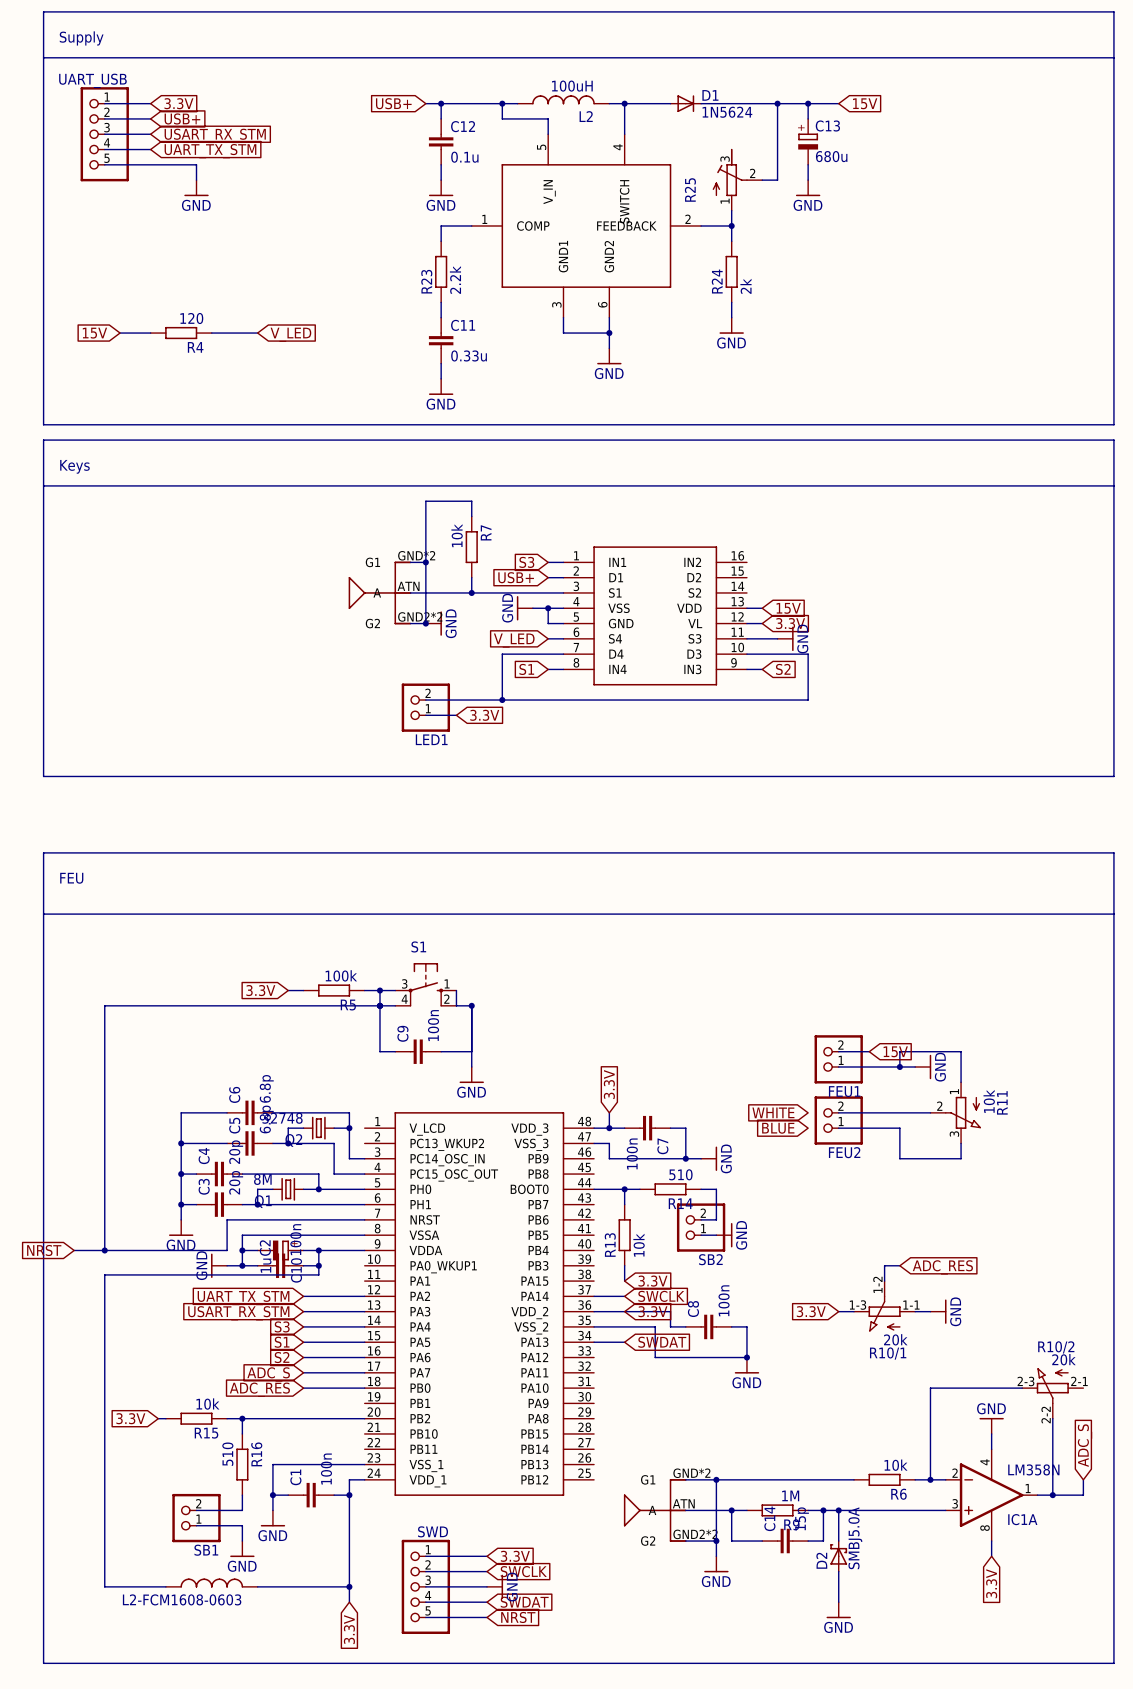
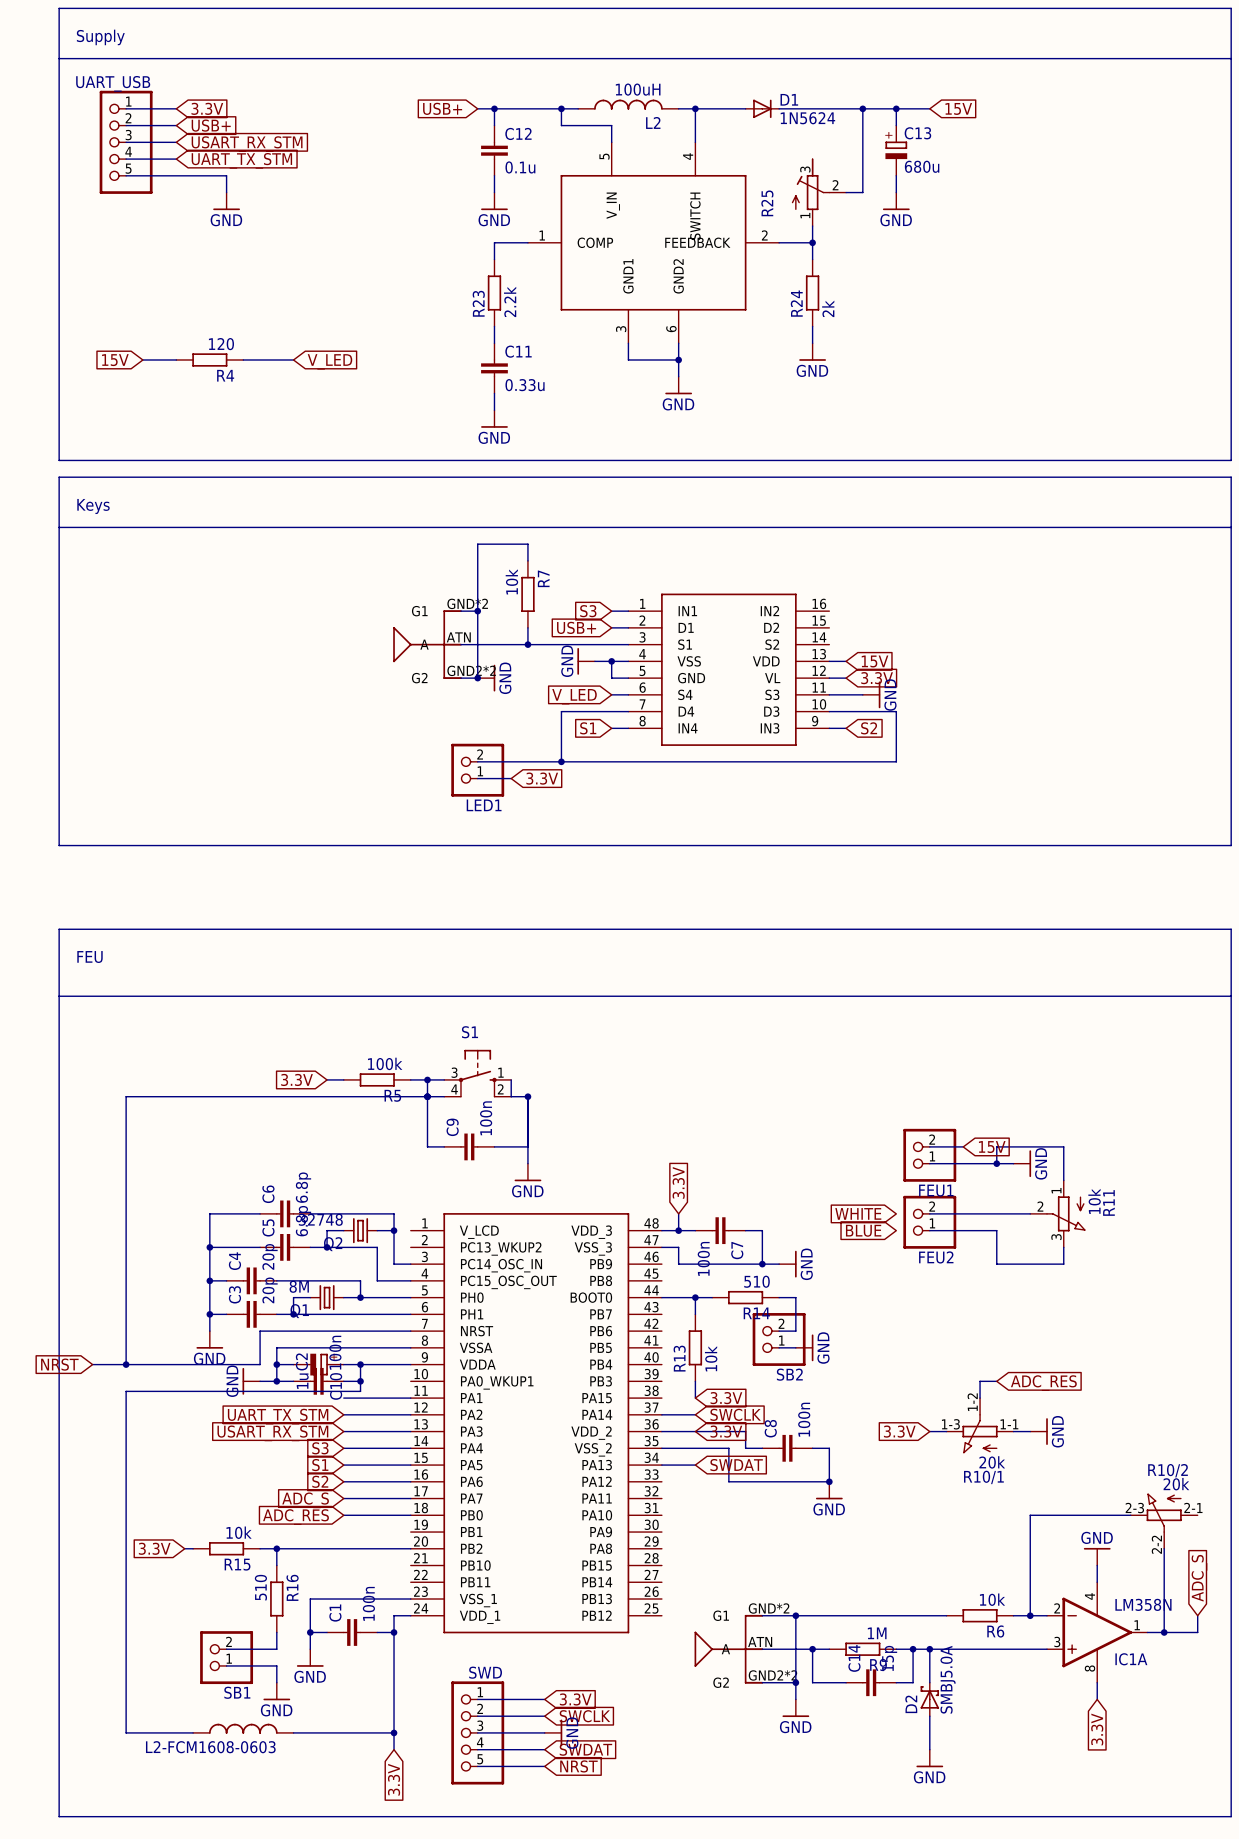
wire: none -> (343, 1398) (410, 1398)

